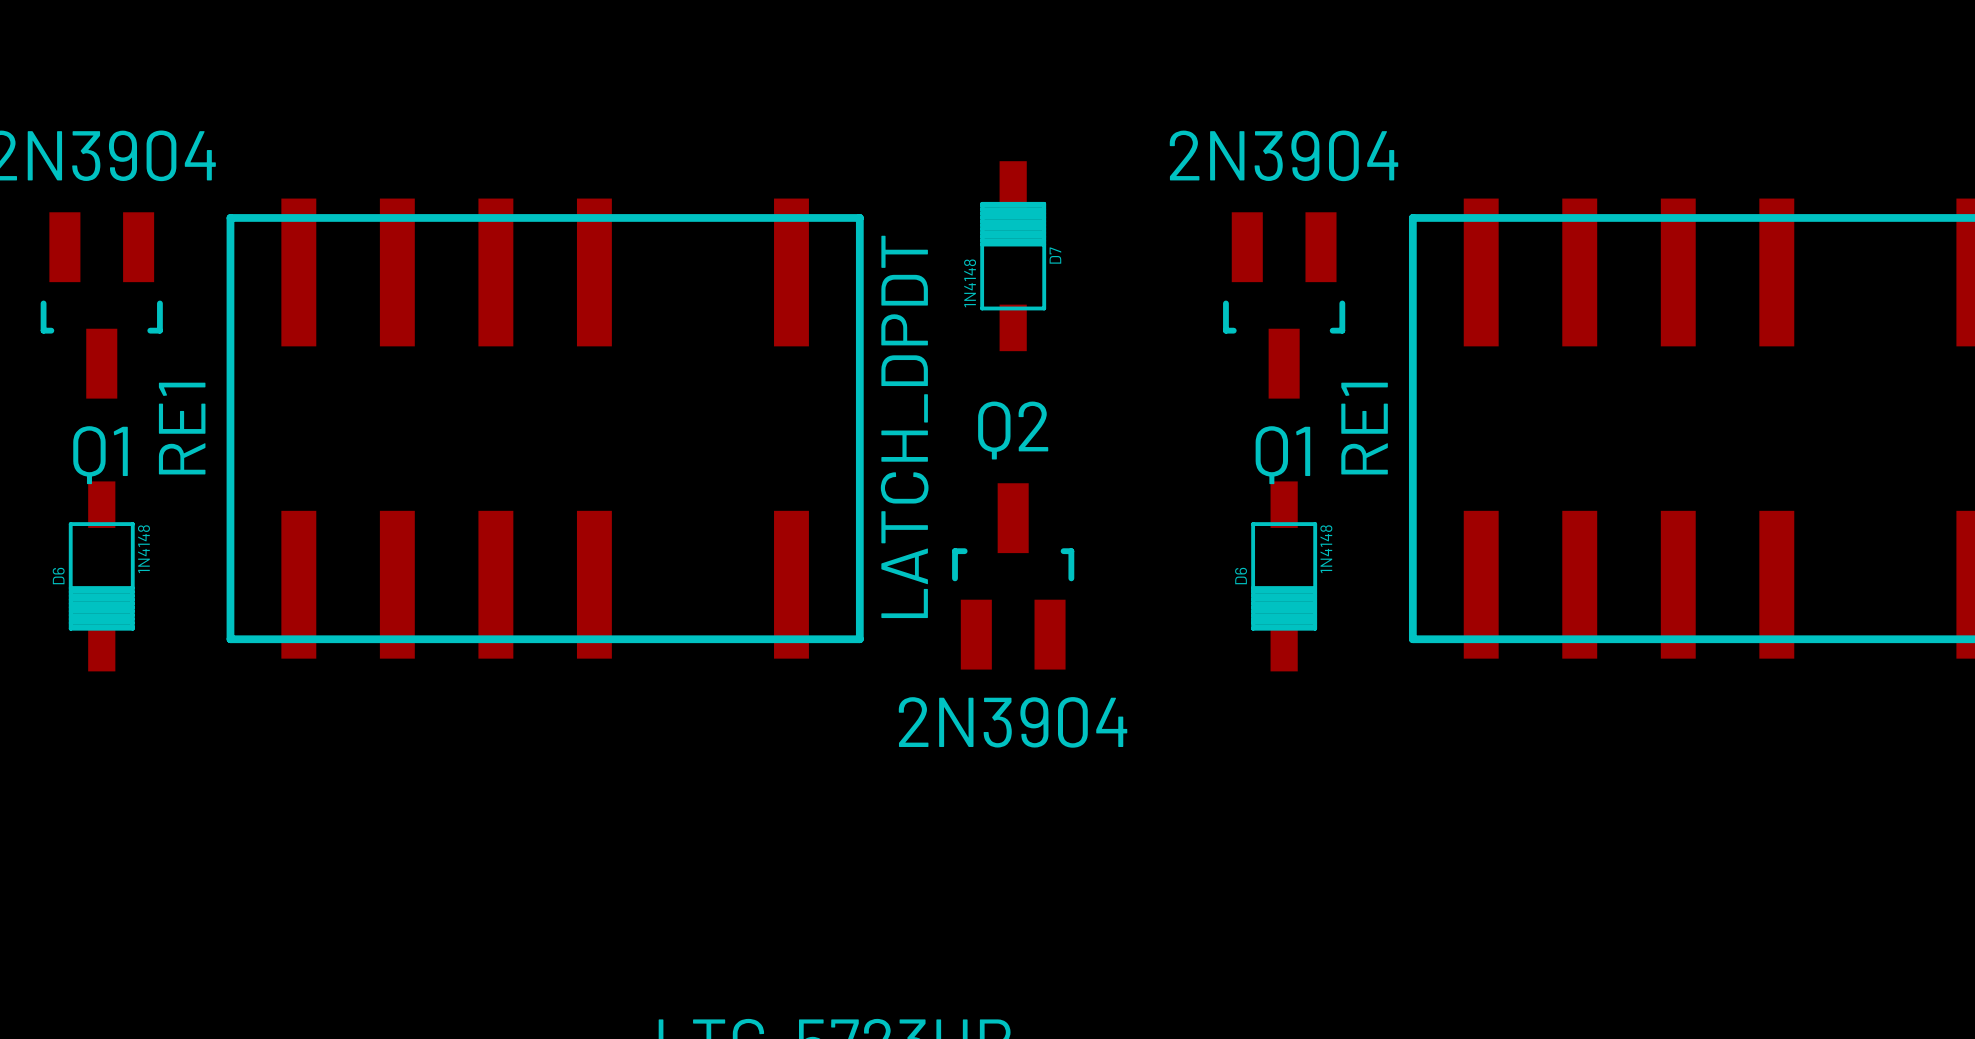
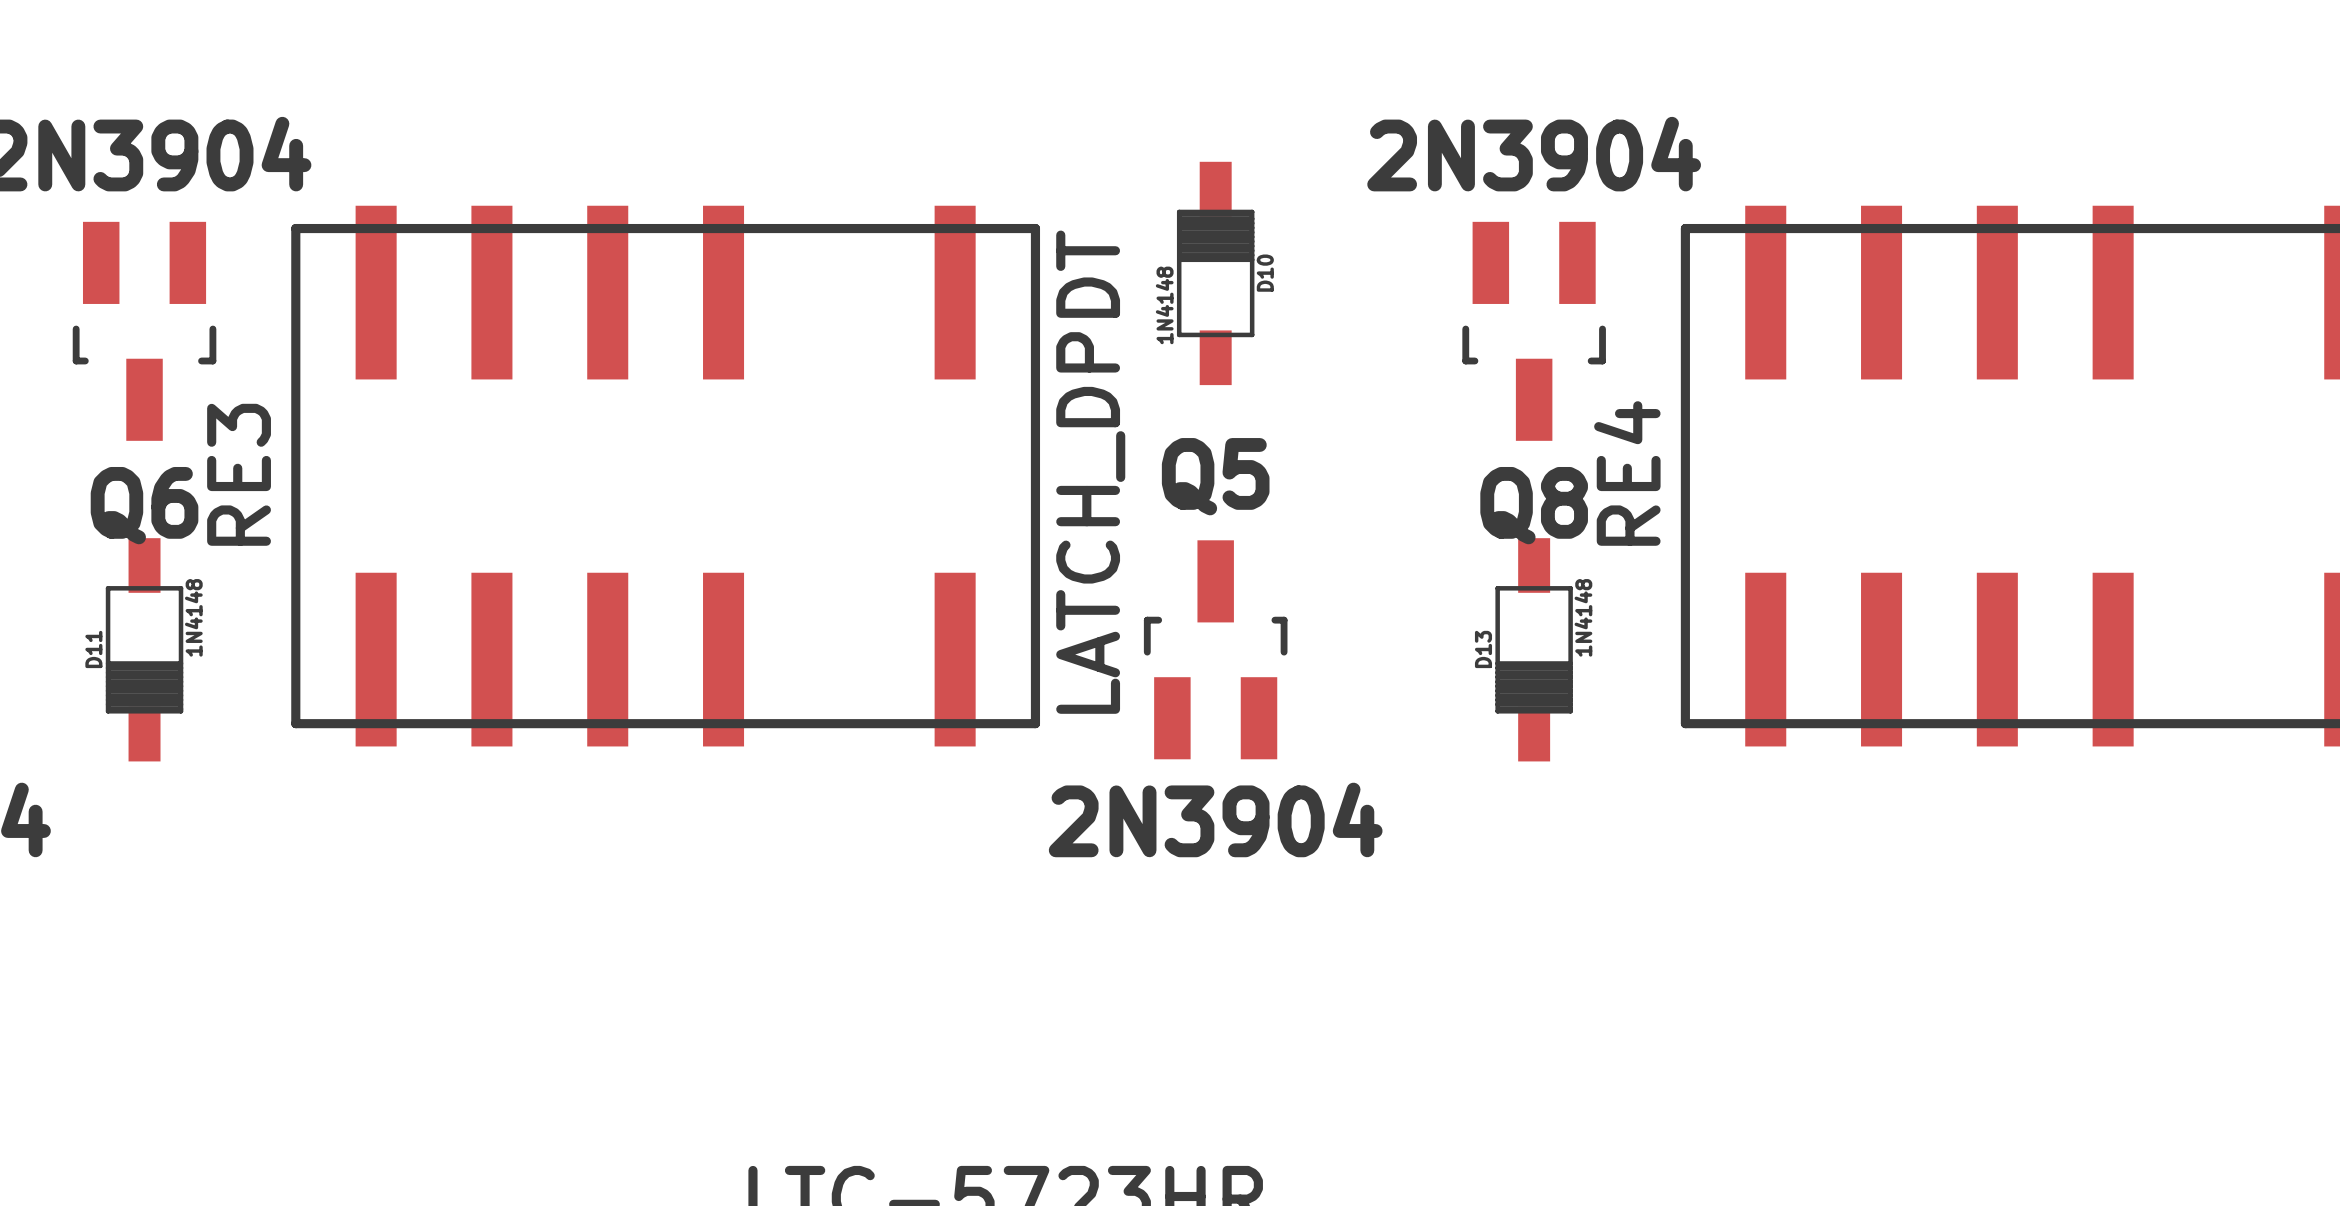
D7 name: D7 (1055, 255) -> D10 (1265, 273)
RE1 name: RE1 (182, 428) -> RE3 (239, 474)
RE1 name: RE1 (1364, 428) -> RE4 (1627, 473)
Q2 name: Q2 (1013, 430) -> Q5 (1215, 476)
Q1 name: Q1 (100, 455) -> Q6 (144, 505)
Q1 name: Q1 (1282, 455) -> Q8 (1534, 505)
D6 name: D6 (58, 576) -> D11 (93, 649)
D6 name: D6 (1241, 576) -> D13 (1483, 649)

